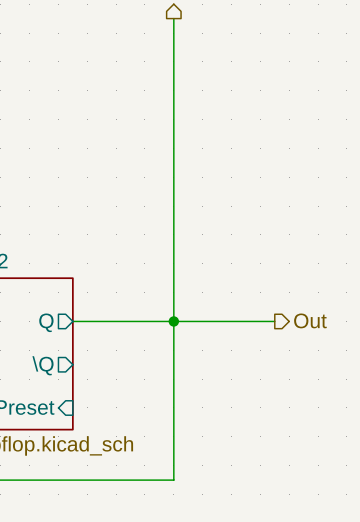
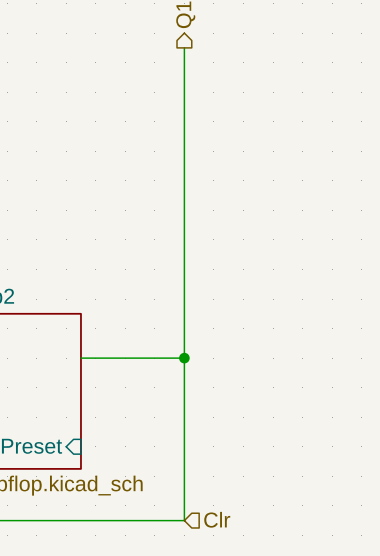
hierarchical label: Out (310, 320) -> none
wire: (173, 321) (274, 321) -> none
sheet pin: Q (46, 322) -> none
sheet pin: \Q (42, 365) -> none
hierarchical label: none -> Clr (217, 519)

